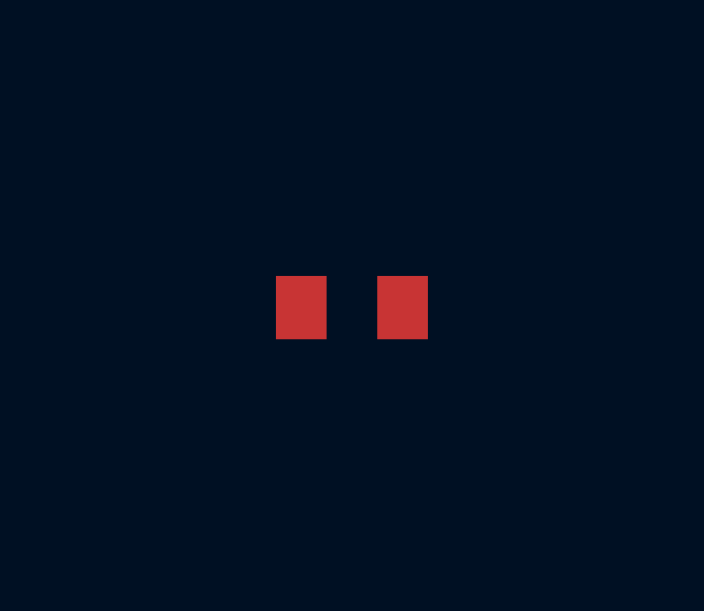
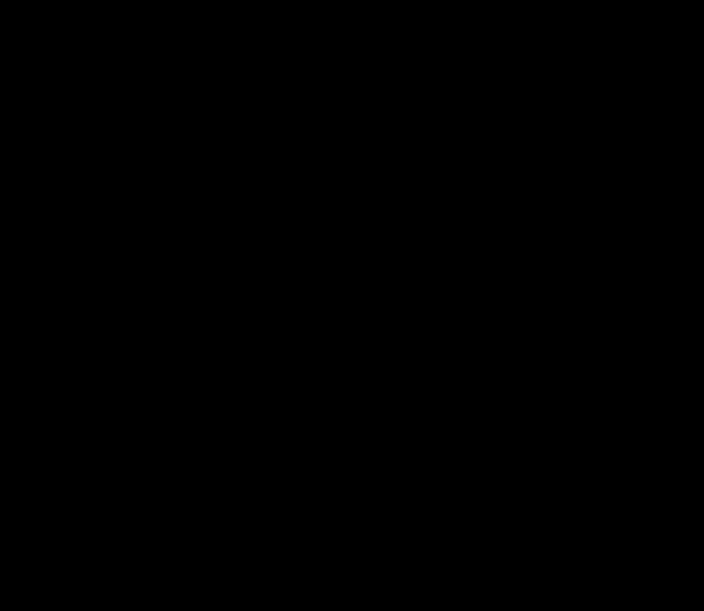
part: (351, 307) -> none

